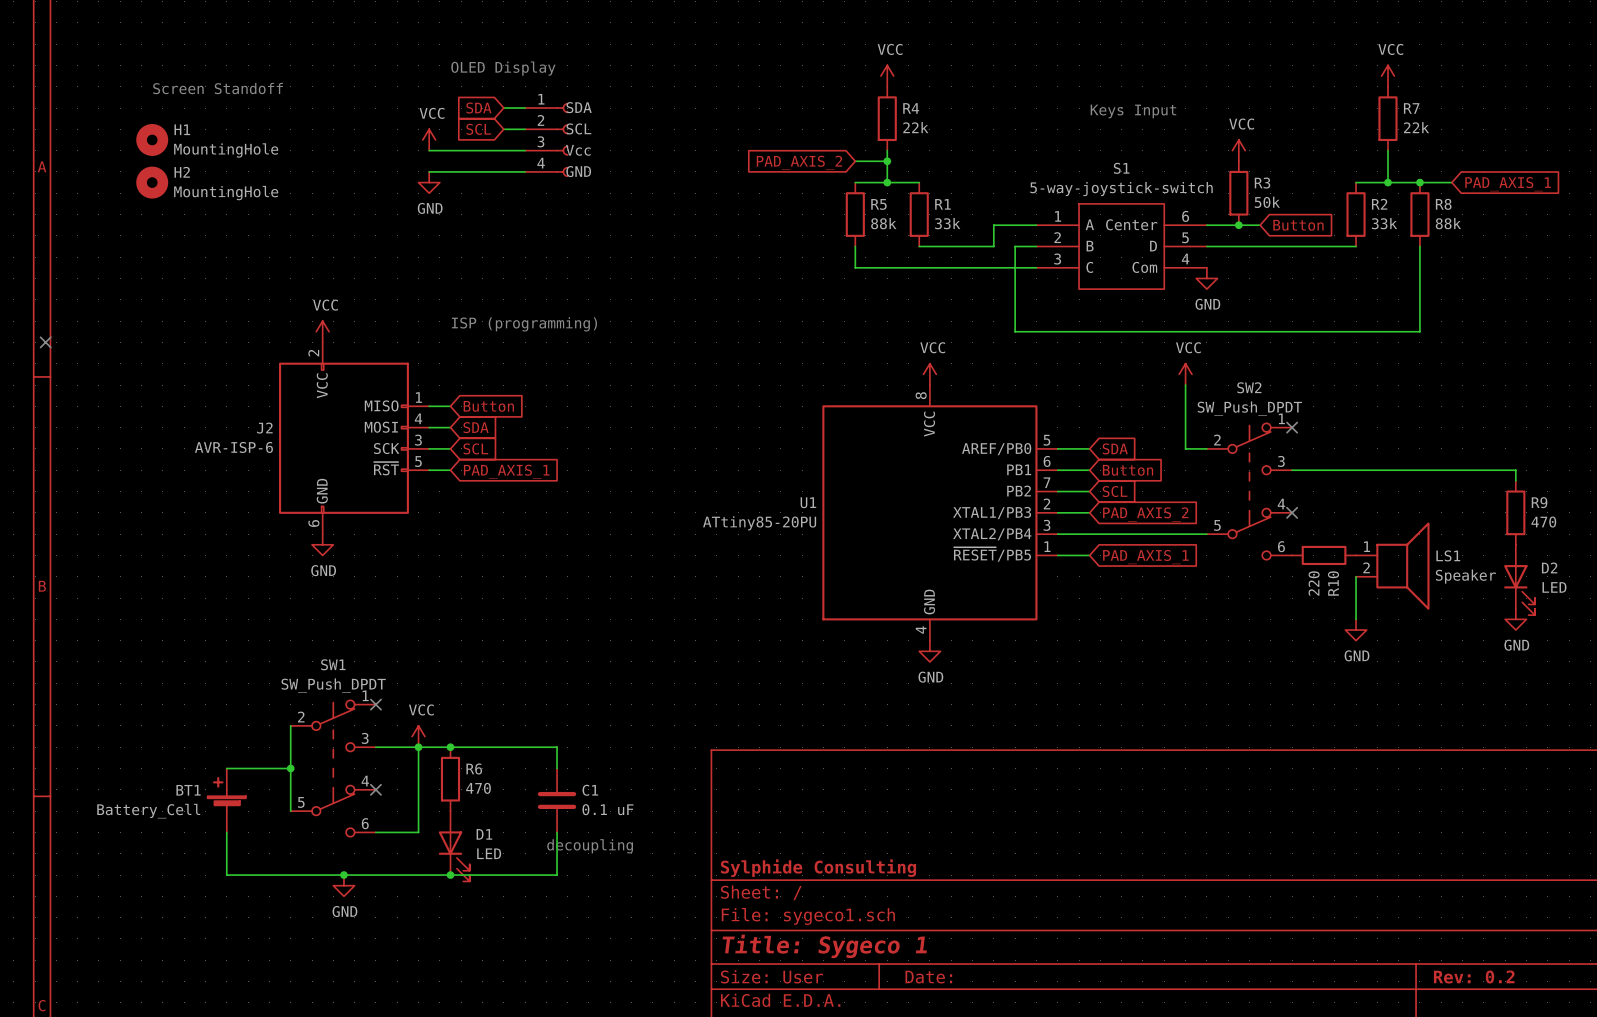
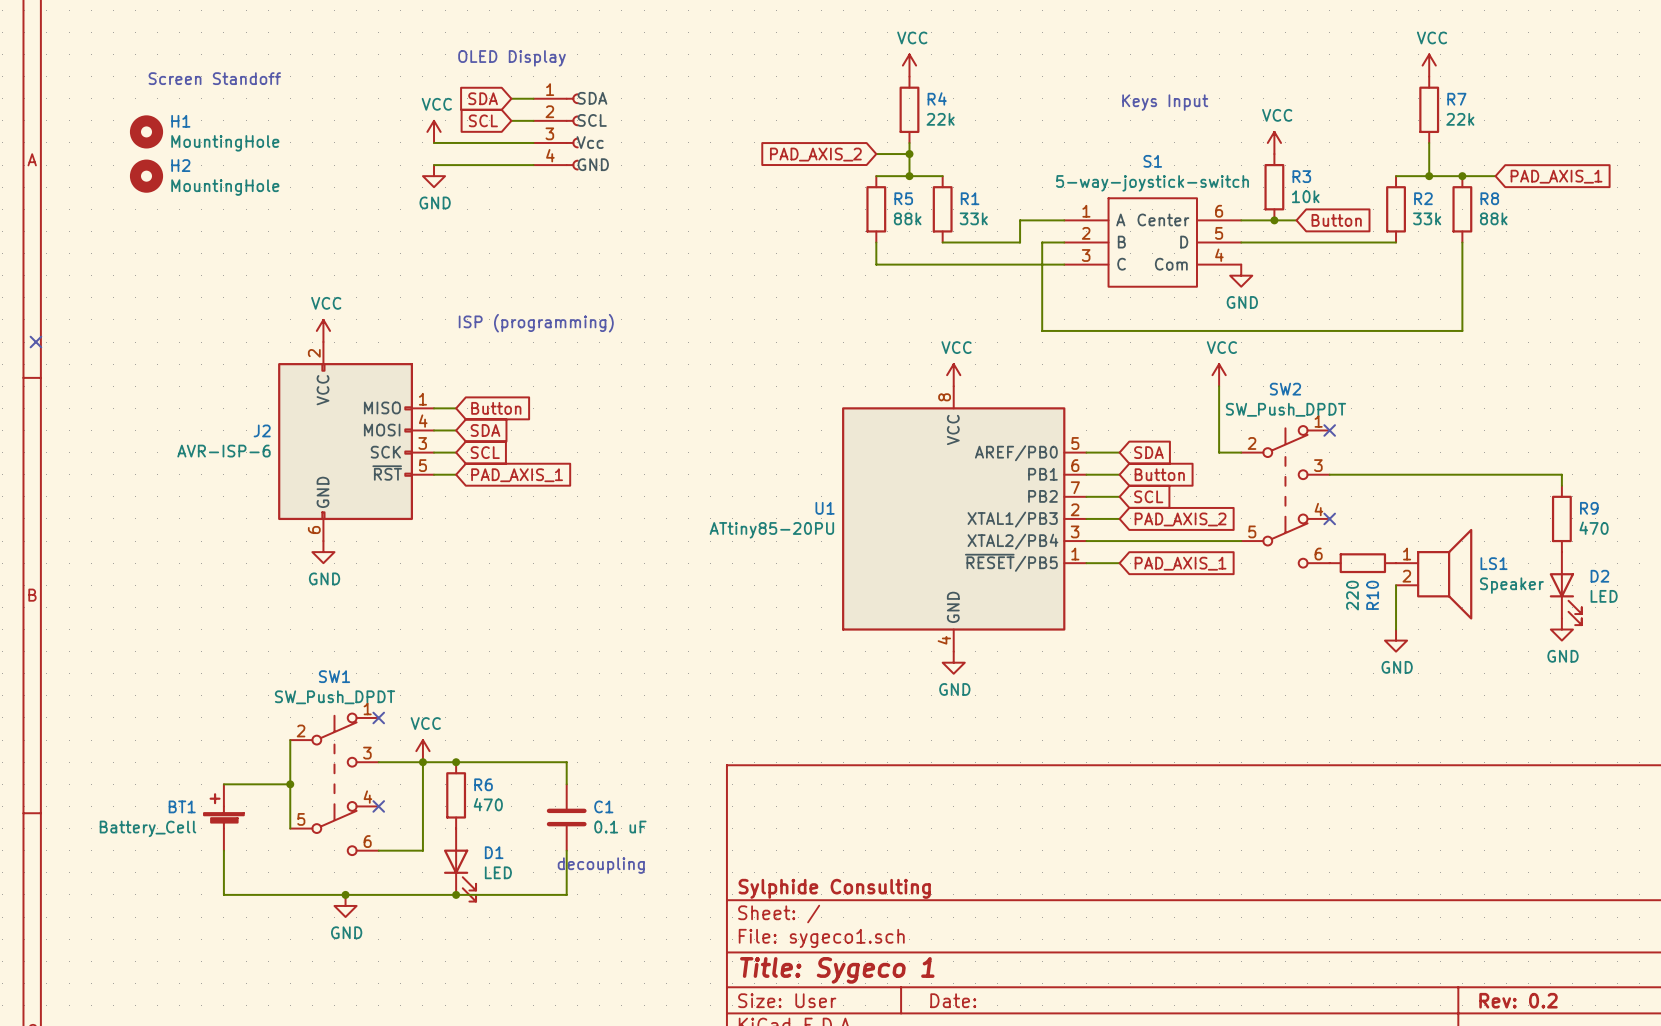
R3 value: 50k (1267, 202) -> 10k (1305, 196)

